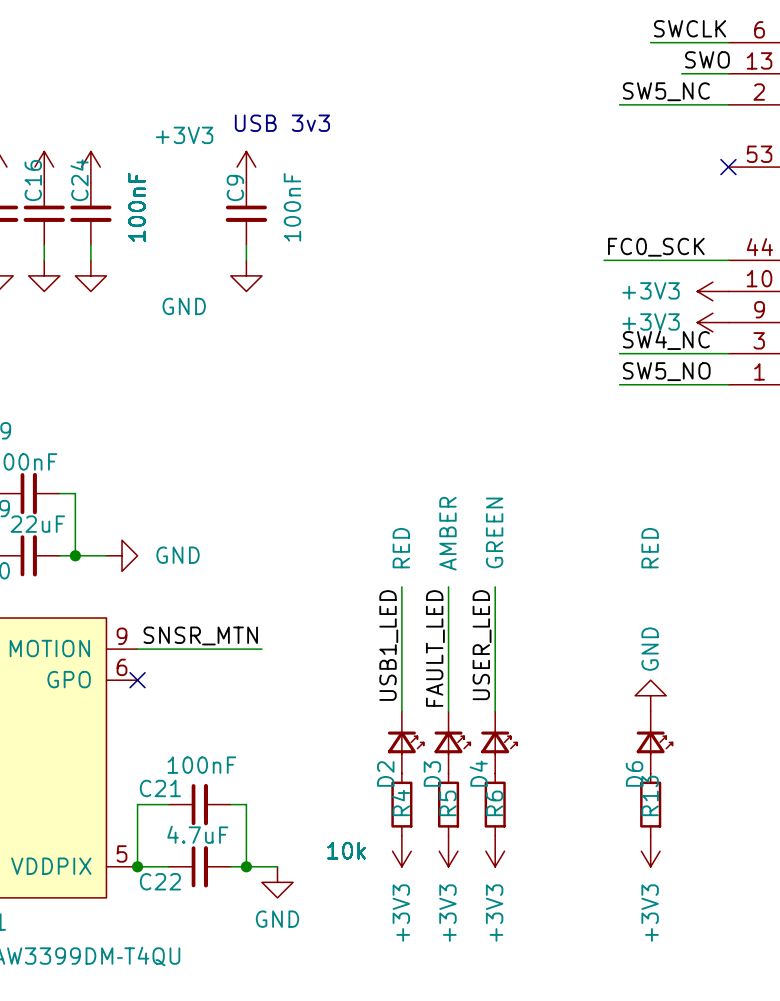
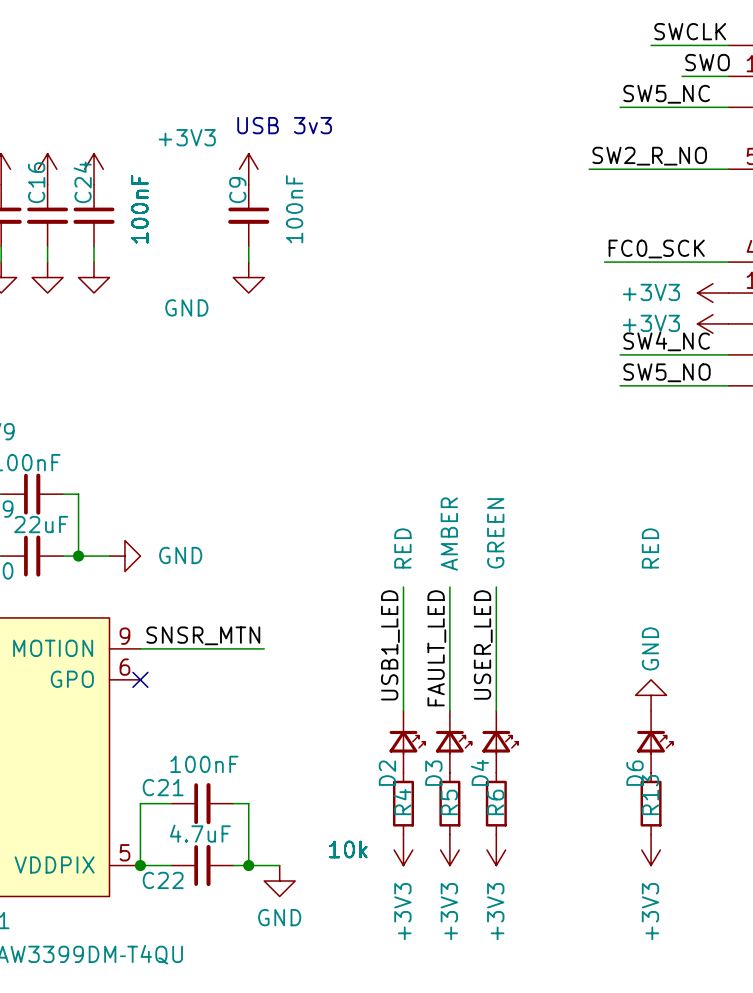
label: none -> SW2_R_NO (649, 156)
wire: none -> (589, 169) (728, 169)
no-connect mark: (728, 167) -> none

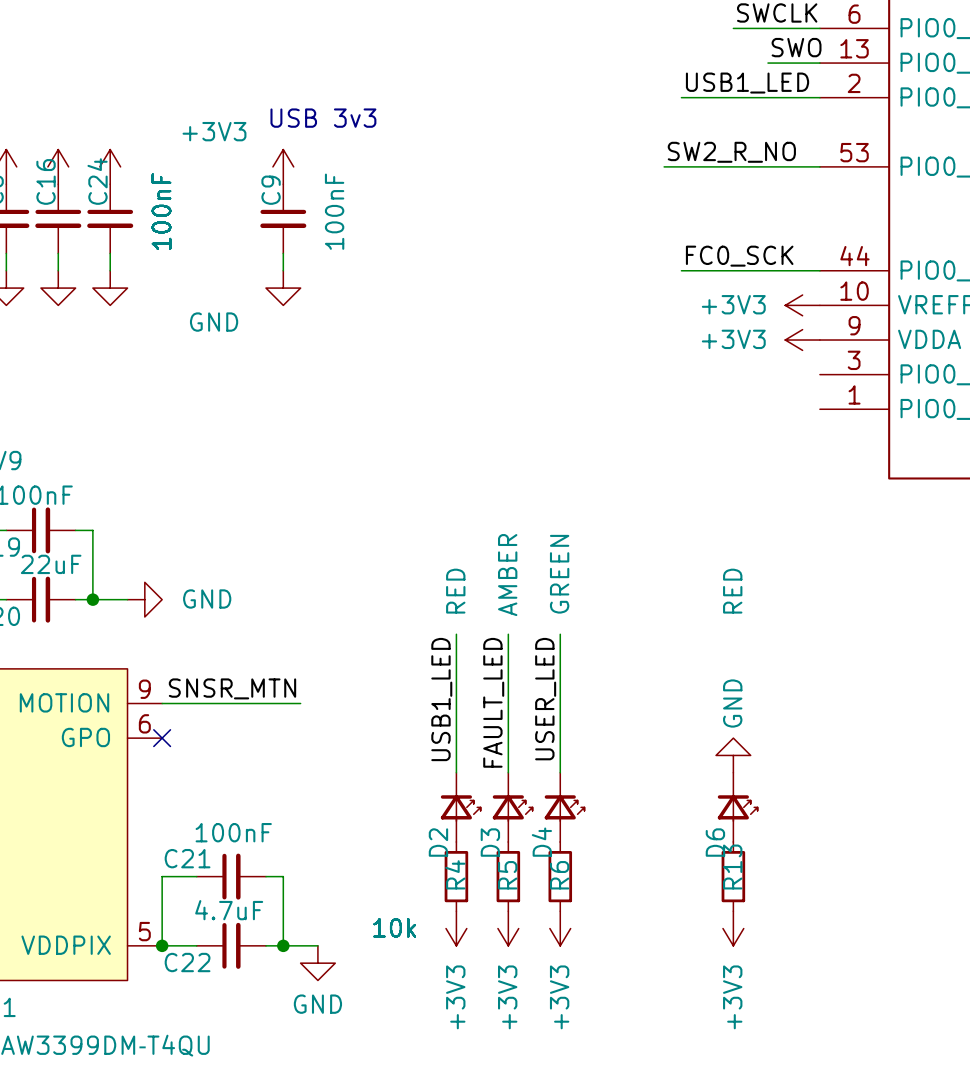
label: none -> USB1_LED (747, 83)
label: SW5_NC (666, 94) -> none
wire: none -> (681, 97) (698, 97)
label: SW4_NC (666, 341) -> none
wire: (620, 354) (728, 354) -> none
label: SW5_NO (667, 372) -> none
wire: (620, 385) (728, 385) -> none

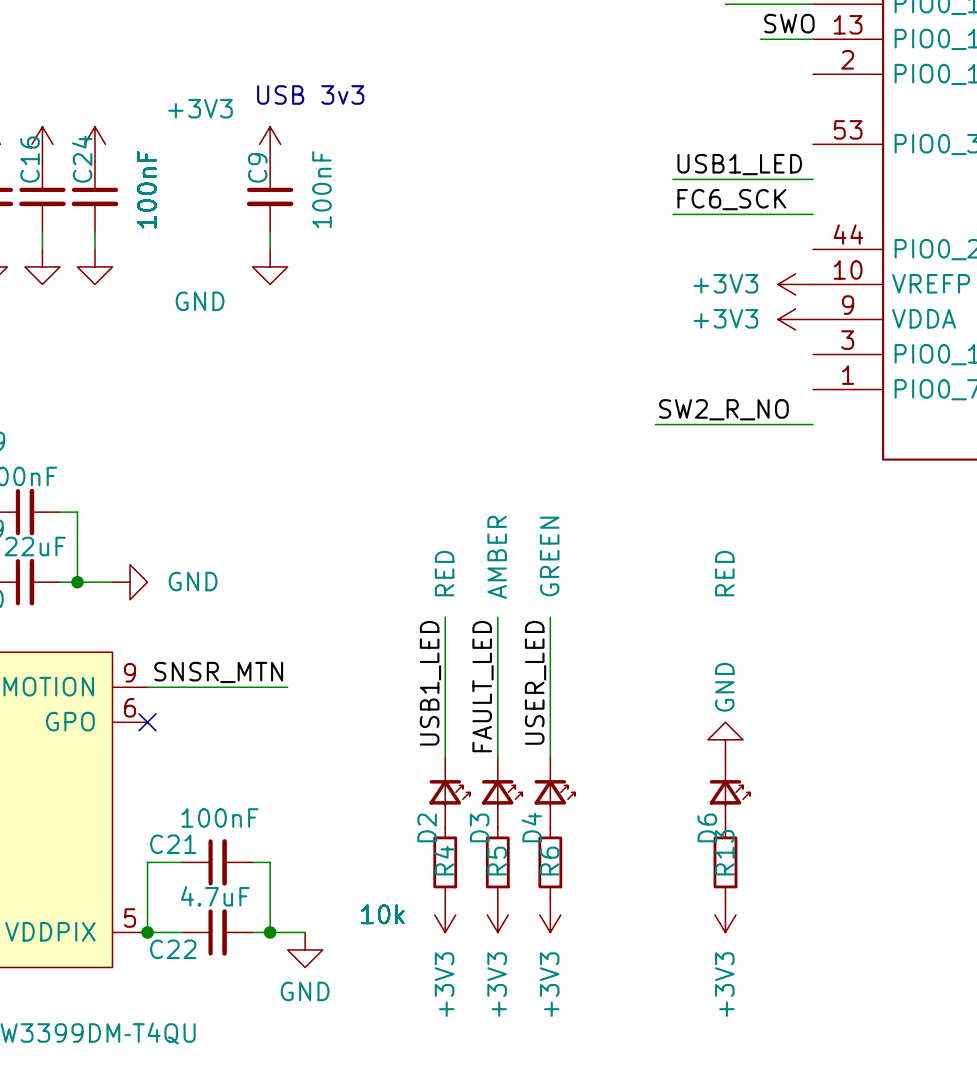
label position: USB1_LED (747, 83) -> USB1_LED (739, 164)
wire: (681, 97) (819, 97) -> (672, 179) (813, 179)
label position: SW2_R_NO (731, 152) -> SW2_R_NO (723, 409)
wire: (664, 166) (819, 166) -> (655, 424) (813, 424)
label: FC0_SCK (739, 256) -> FC6_SCK (731, 199)
wire: (681, 270) (819, 270) -> (672, 214) (813, 214)

